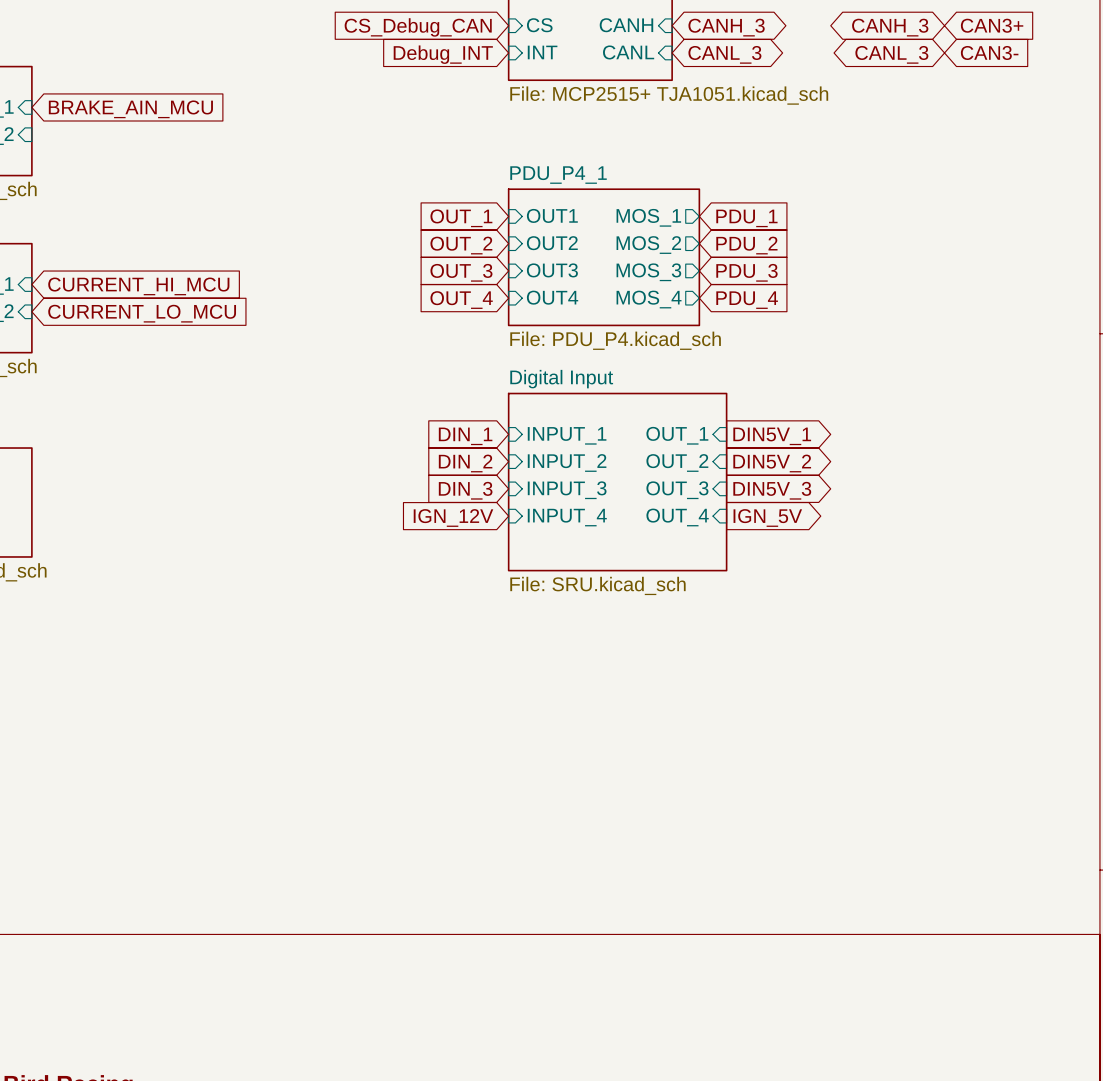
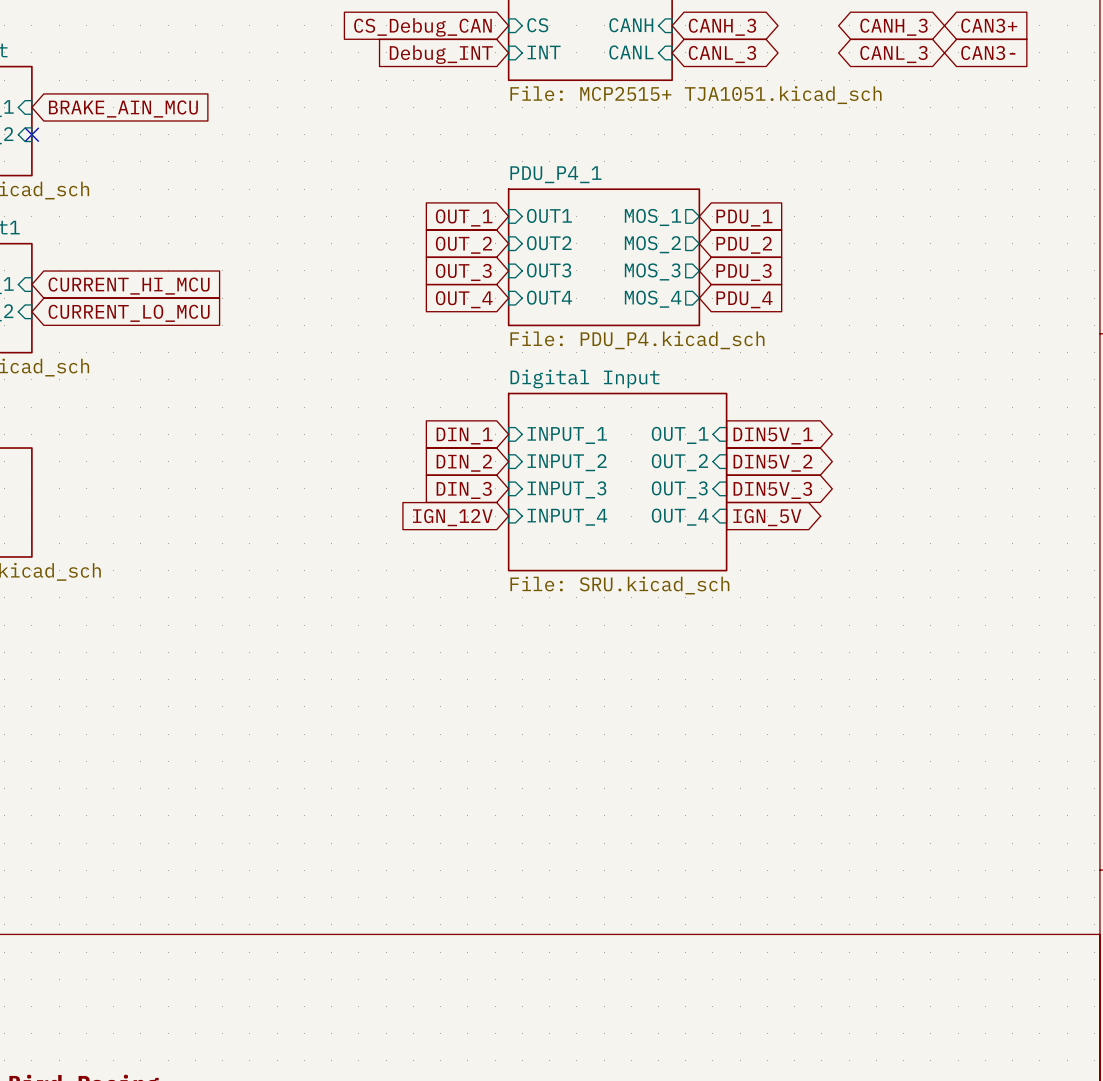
no-connect mark: none -> (31, 134)

